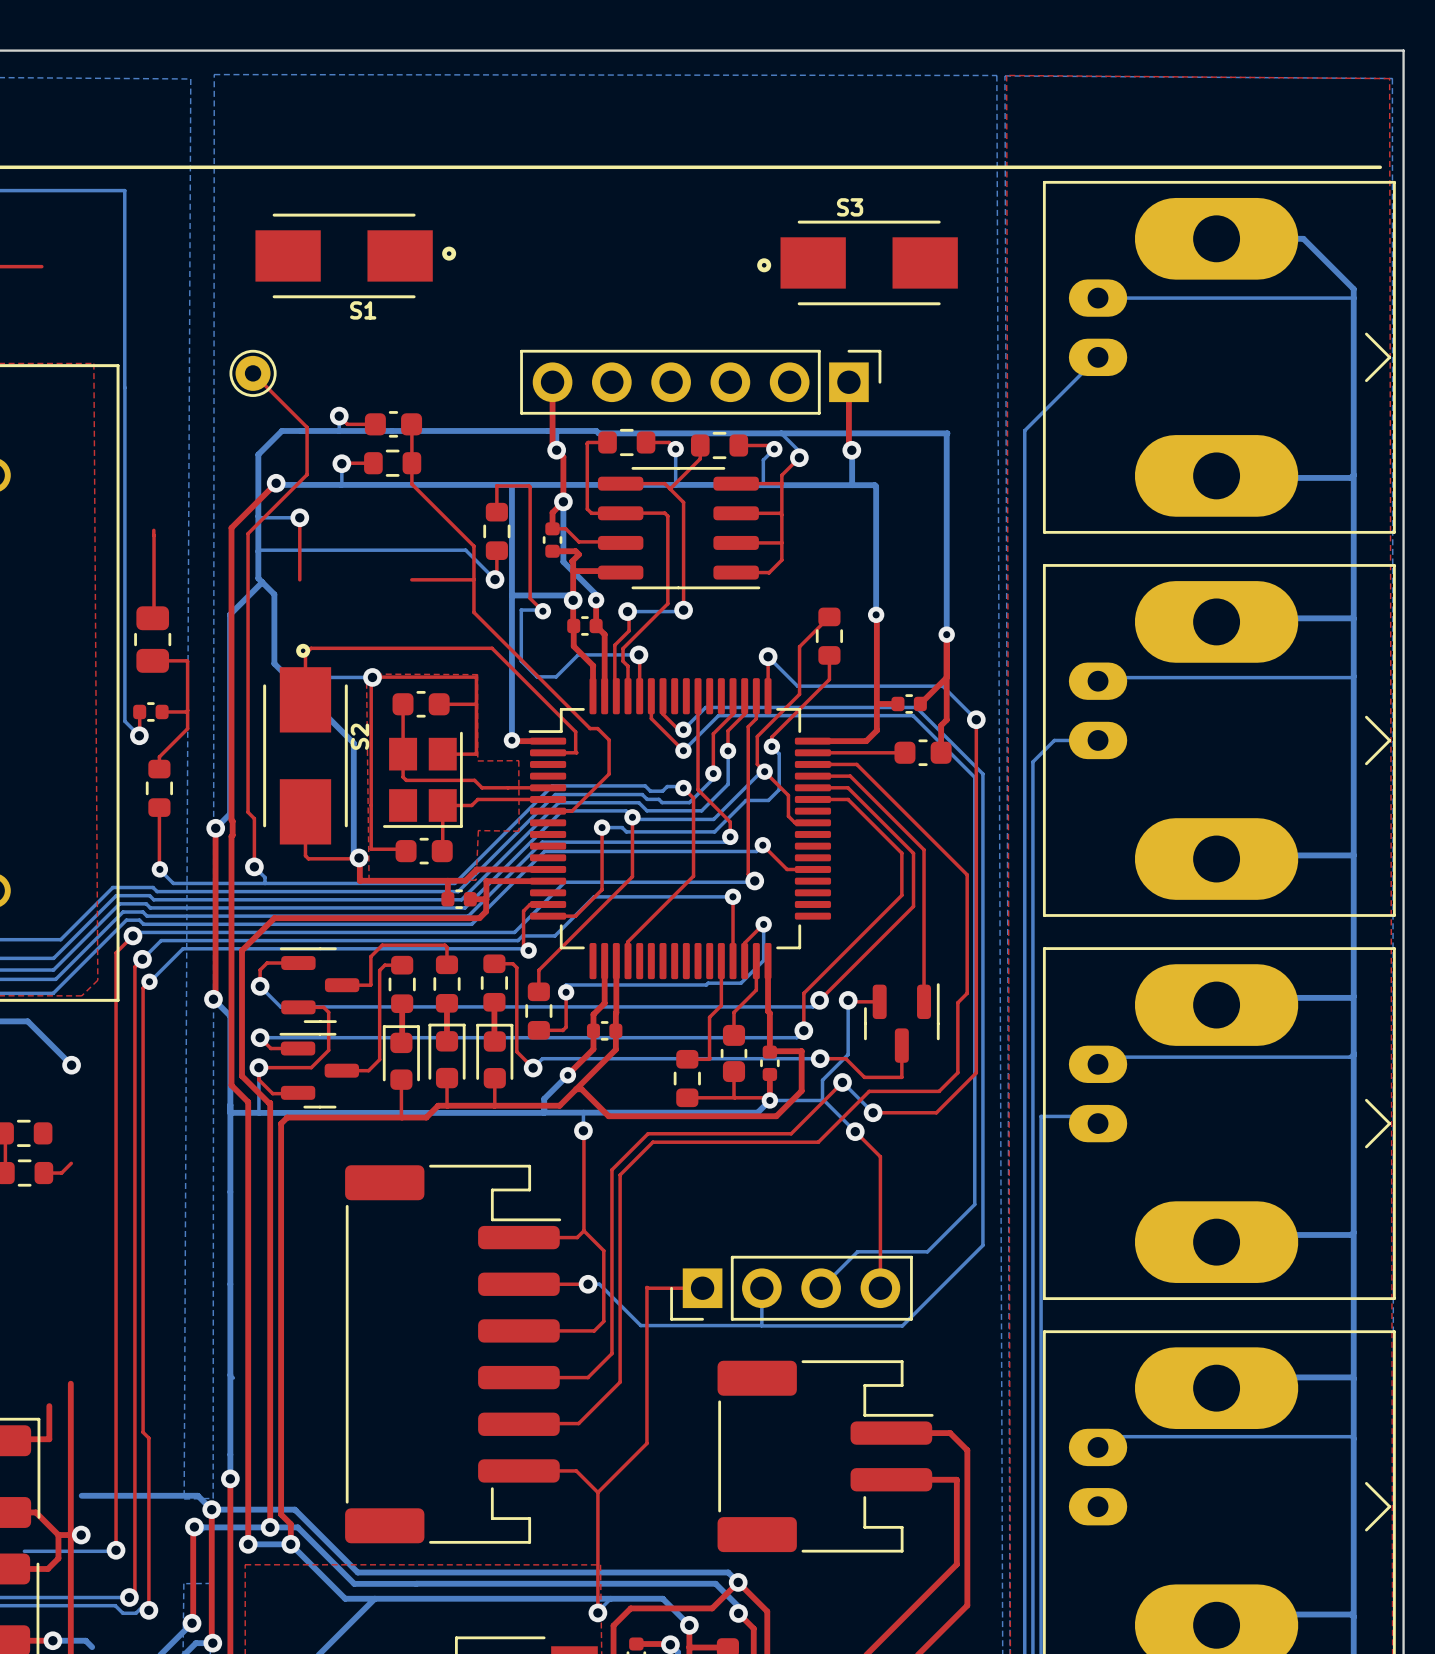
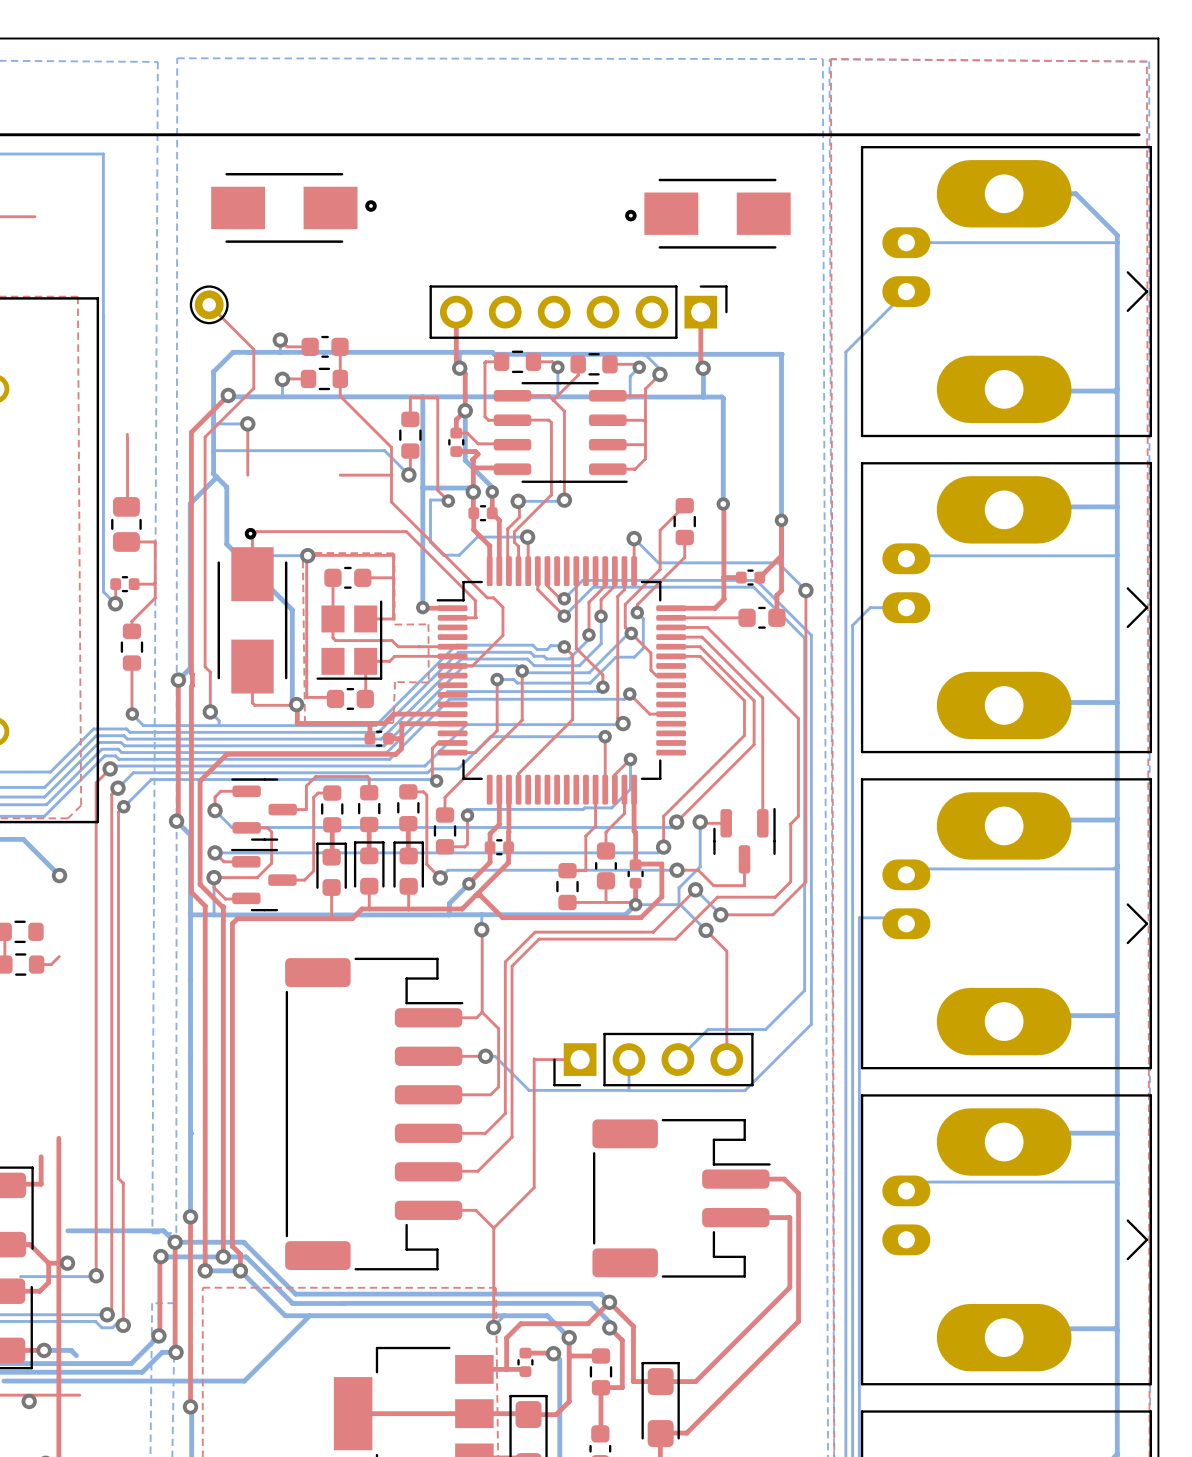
S3 name: S3 (850, 207) -> none
S1 name: S1 (363, 310) -> none
S2 name: S2 (359, 736) -> none

